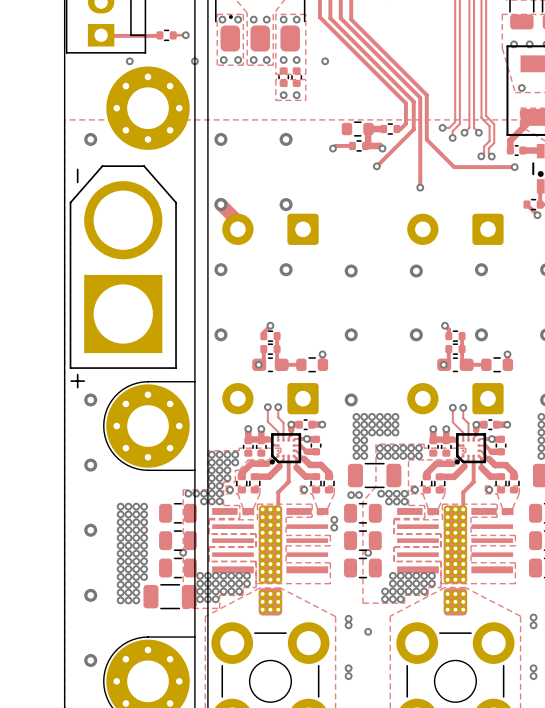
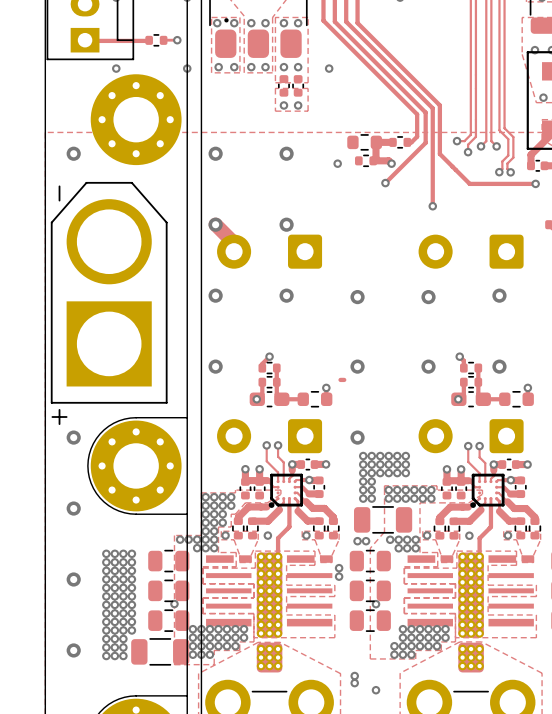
track: (352, 145) (335, 145) (332, 148) -> none
track: none -> (340, 379) (344, 379)
via: none -> (267, 535)
via: none -> (469, 535)

